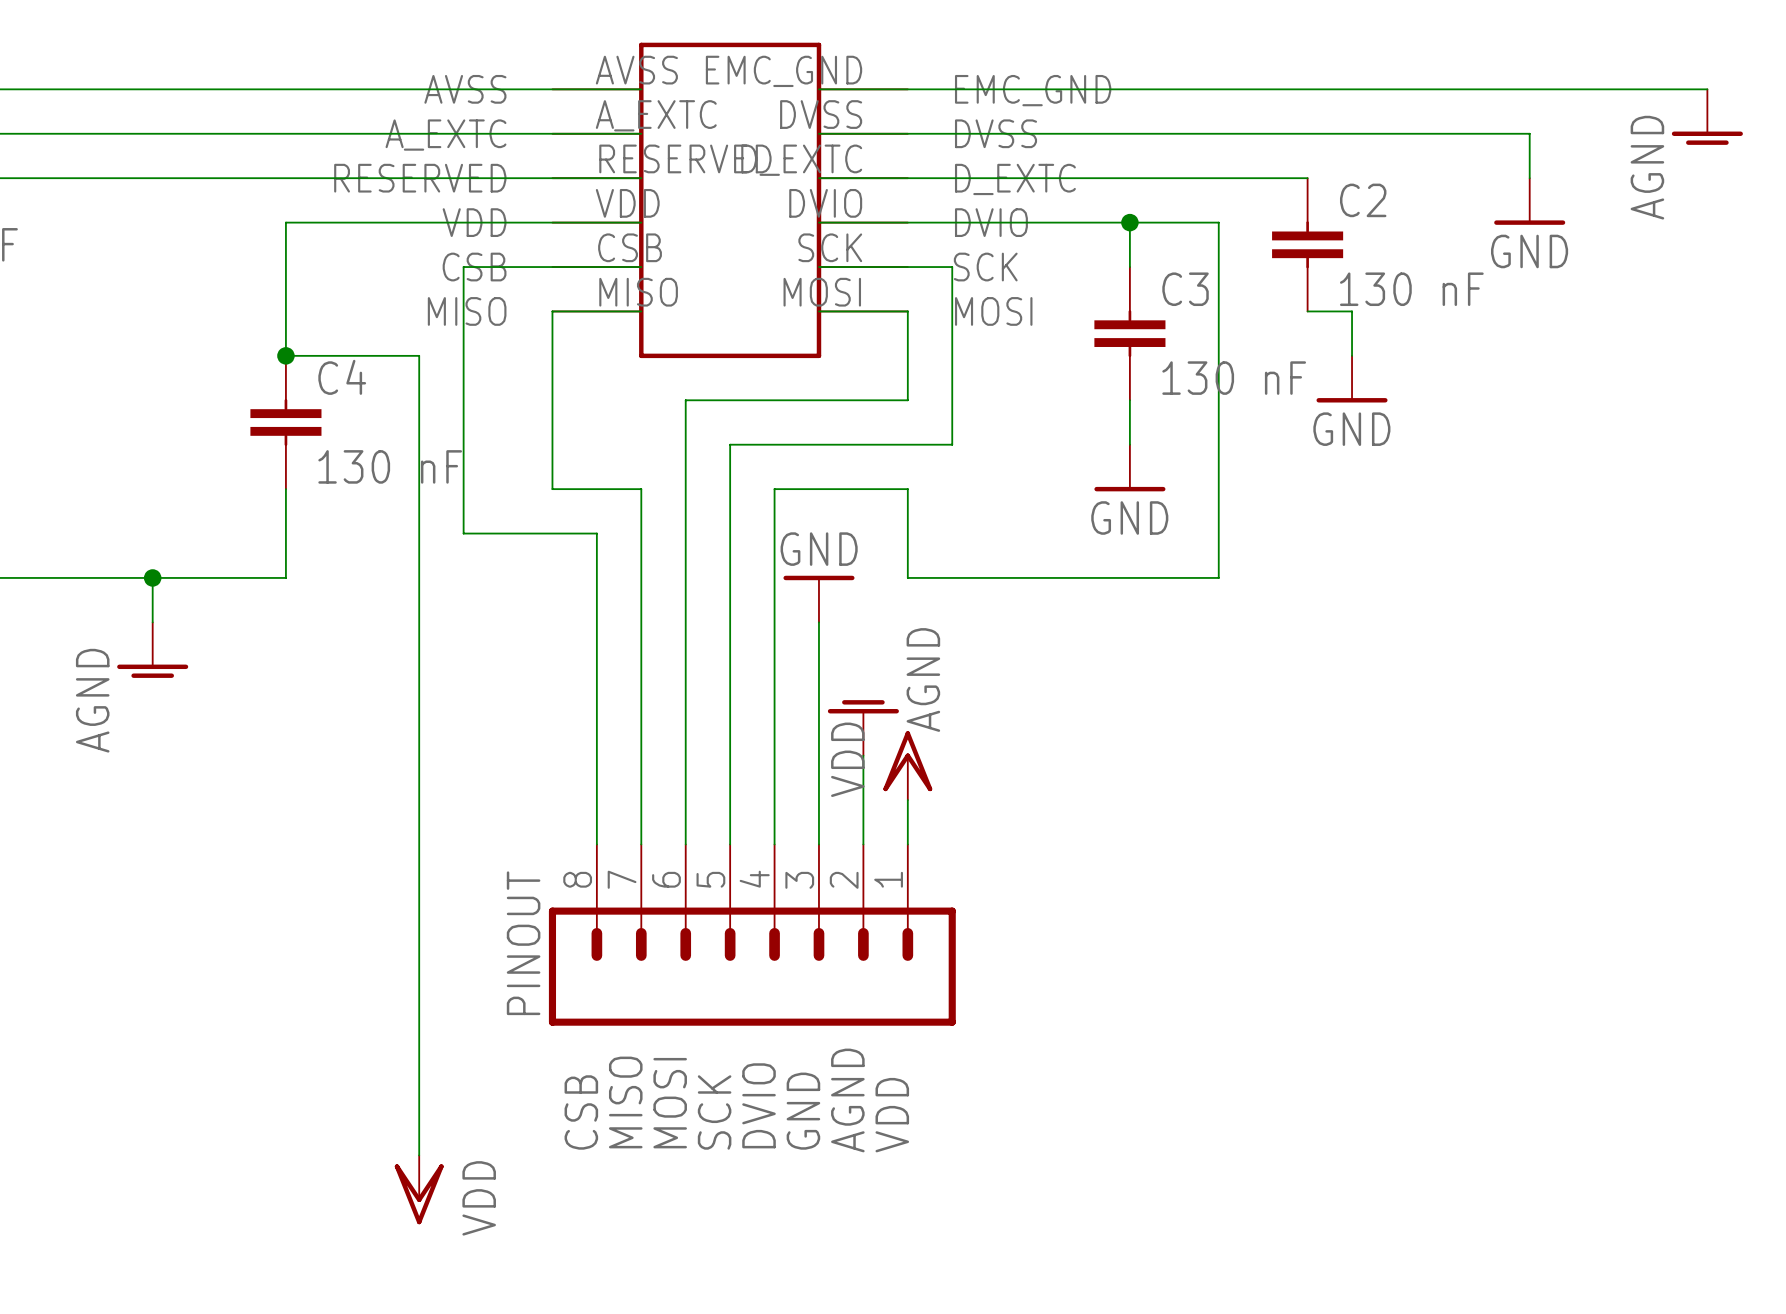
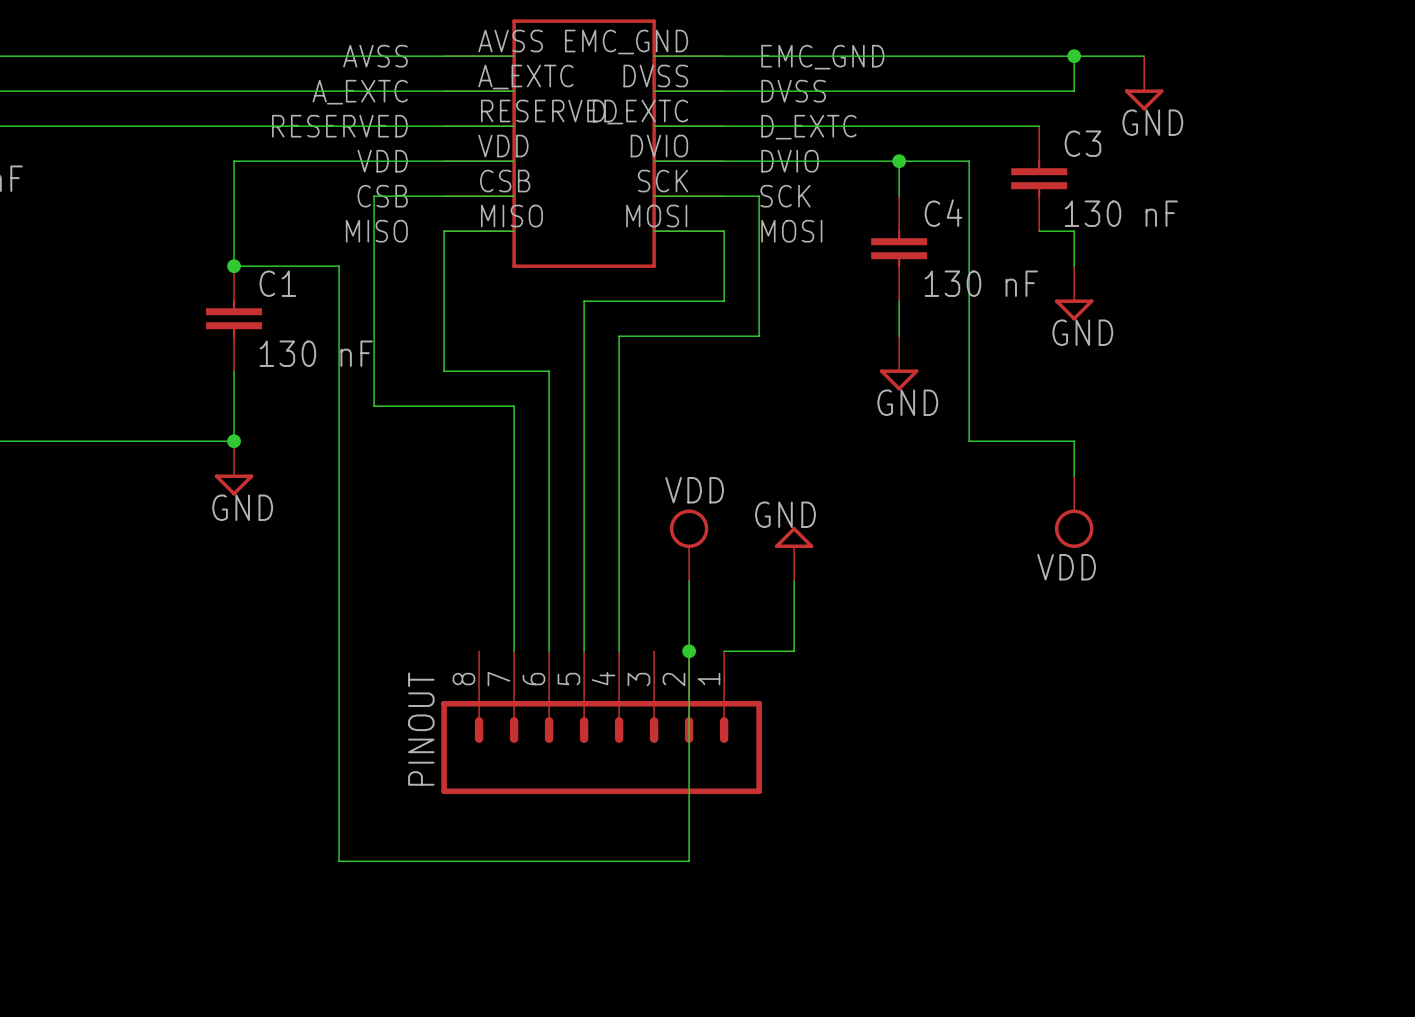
junction: none -> (1074, 56)
wire: (1440, 89) (1707, 89) -> none
power symbol: AGND (1707, 117) -> none
power symbol: none -> GND (1144, 83)
wire: (1352, 133) (1529, 133) (1529, 178) -> (1074, 91) (1074, 56)
C2 name: C2 (1363, 200) -> C3 (1083, 143)
power symbol: GND (1529, 201) -> none
C3 name: C3 (1185, 289) -> C4 (943, 213)
power symbol shape: [1316, 355, 1388, 403] -> [1054, 266, 1094, 321]
C4 name: C4 (342, 377) -> C1 (277, 283)
wire: (730, 400) (685, 400) (685, 489) -> (584, 301) (584, 336)
wire: (730, 444) (774, 444) -> (619, 371) (619, 336)
power symbol shape: [1094, 444, 1166, 492] -> [879, 336, 919, 391]
wire: (641, 489) (641, 533) -> (479, 406) (514, 406)
wire: none -> (514, 371) (549, 371)
wire: (774, 489) (907, 489) (907, 577) (1218, 577) -> (1074, 476) (1074, 441) (969, 441)
wire: (596, 533) (596, 844) -> none
wire: (152, 577) (152, 622) -> none
junction: (152, 577) -> none
junction: none -> (234, 441)
power symbol: GND (818, 599) -> none
power symbol: none -> GND (234, 468)
wire: (818, 622) (818, 844) -> none
power symbol: AGND (152, 650) -> none
power symbol: none -> VDD (1074, 512)
power symbol: none -> VDD (689, 545)
power symbol: none -> GND (794, 554)
power symbol: AGND (863, 727) -> none
power symbol: VDD (907, 765) -> none
wire: (907, 800) (907, 844) -> (794, 581) (794, 651) (724, 651)
junction: none -> (689, 651)
label: AGND (847, 1100) -> none
label: MISO (625, 1102) -> none
label: MOSI (670, 1103) -> none
label: DVIO (759, 1105) -> none
wire: (419, 1111) (419, 1155) -> (339, 861) (689, 861) (689, 651)
label: GND (803, 1111) -> none
label: CSB (581, 1112) -> none
label: SCK (714, 1112) -> none
label: VDD (892, 1115) -> none
power symbol: VDD (419, 1189) -> none

